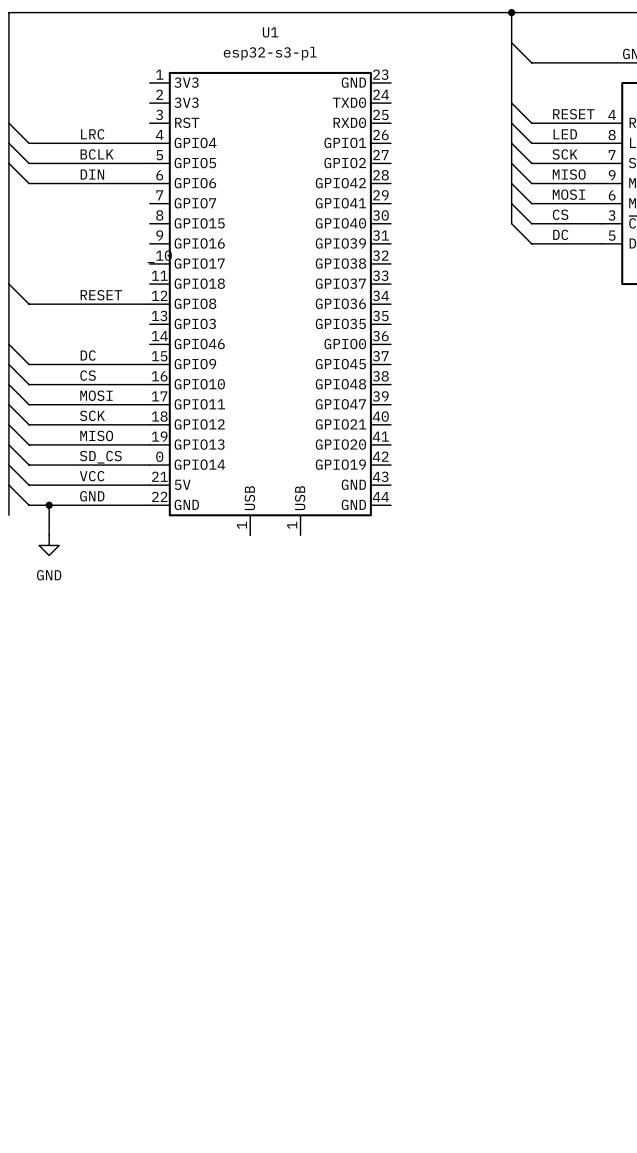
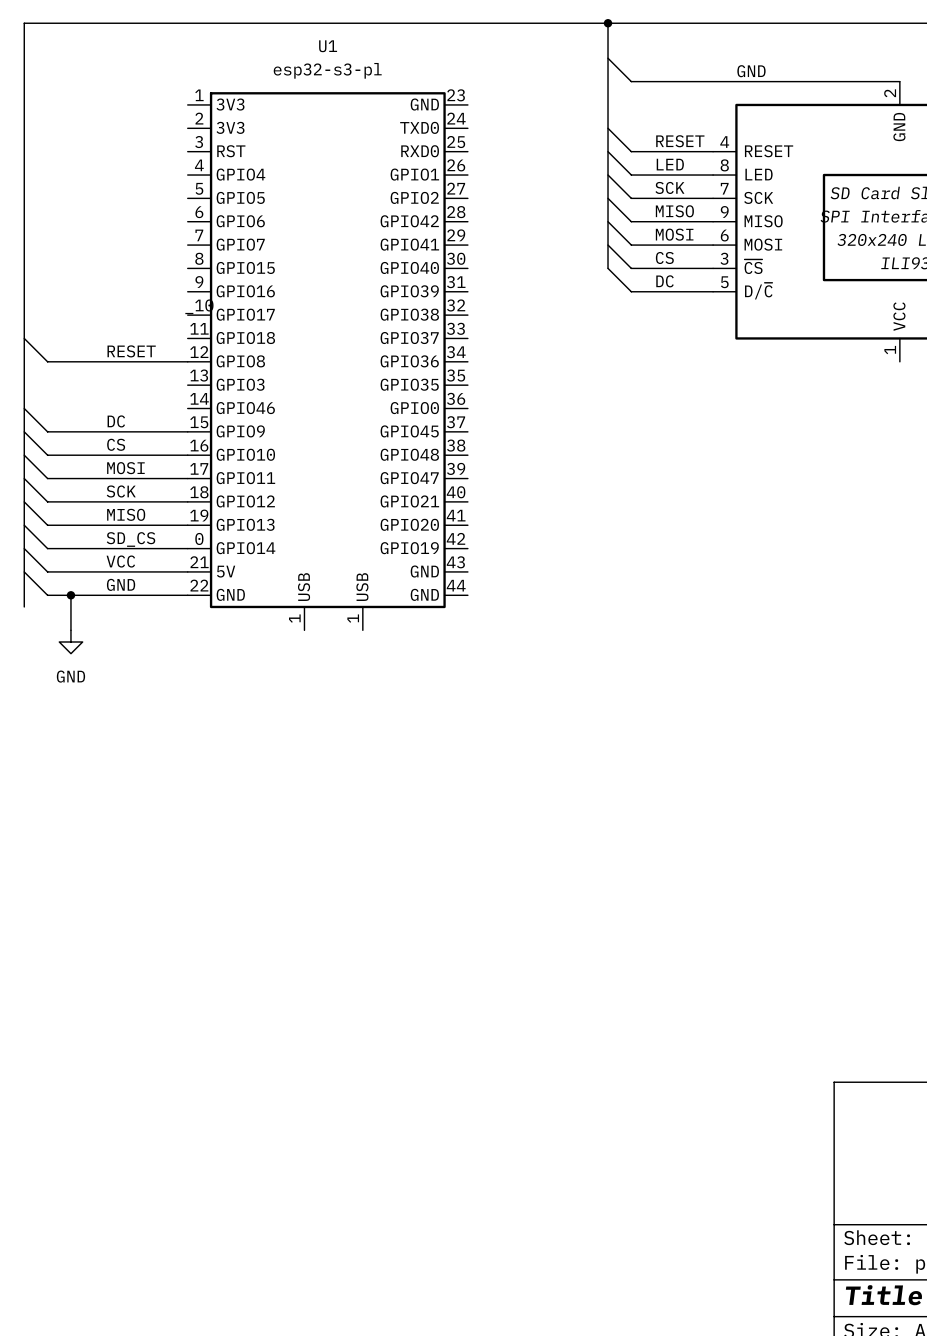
wire: (8, 123) (29, 143) (149, 143) -> none
label: LRC (92, 134) -> none
wire: (8, 143) (29, 163) (149, 163) -> none
label: BCLK (97, 154) -> none
wire: (8, 163) (29, 183) (149, 183) -> none
label: DIN (92, 174) -> none

